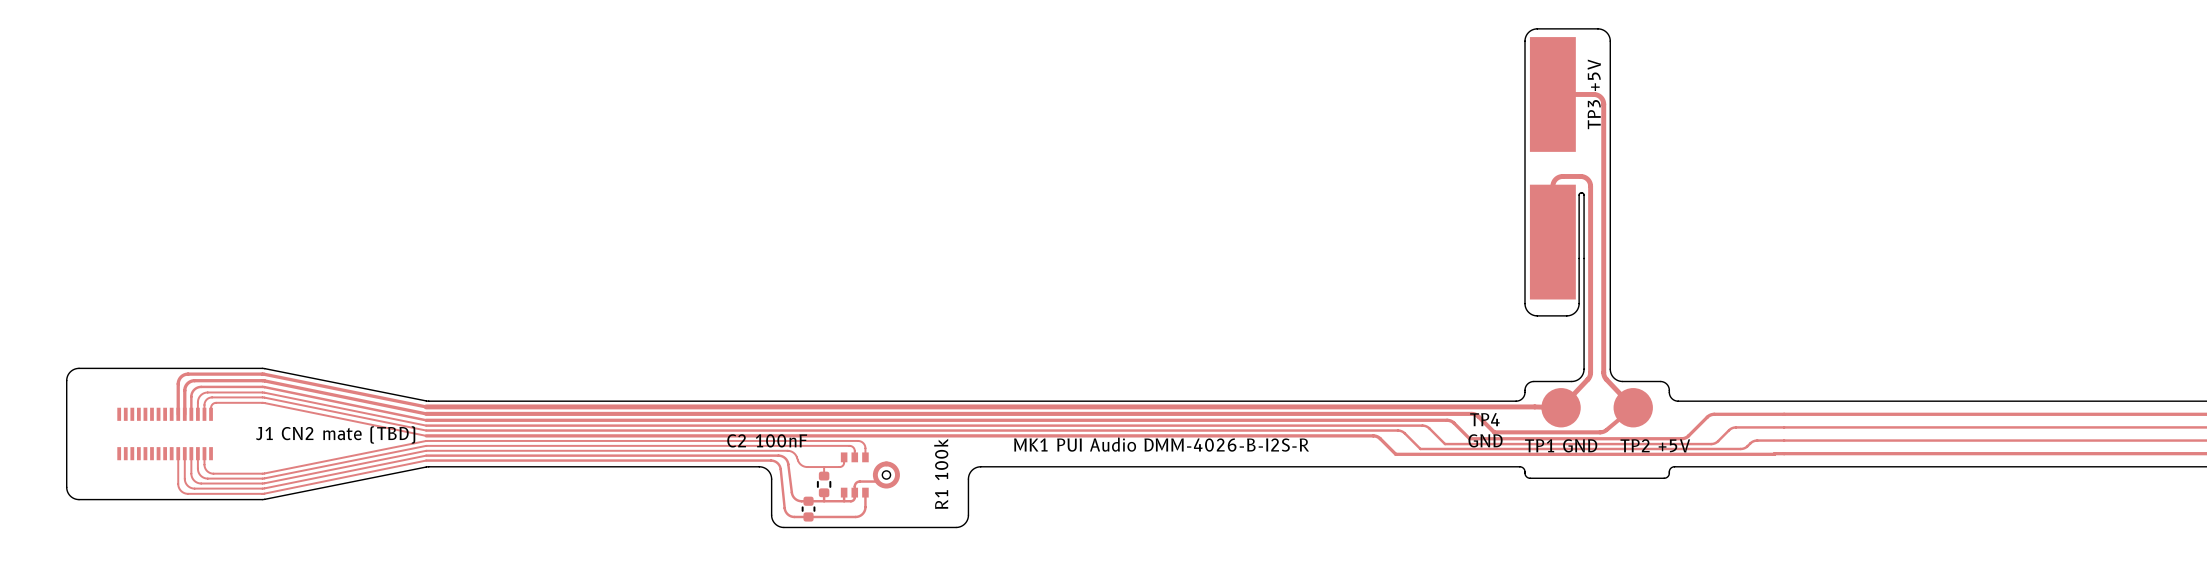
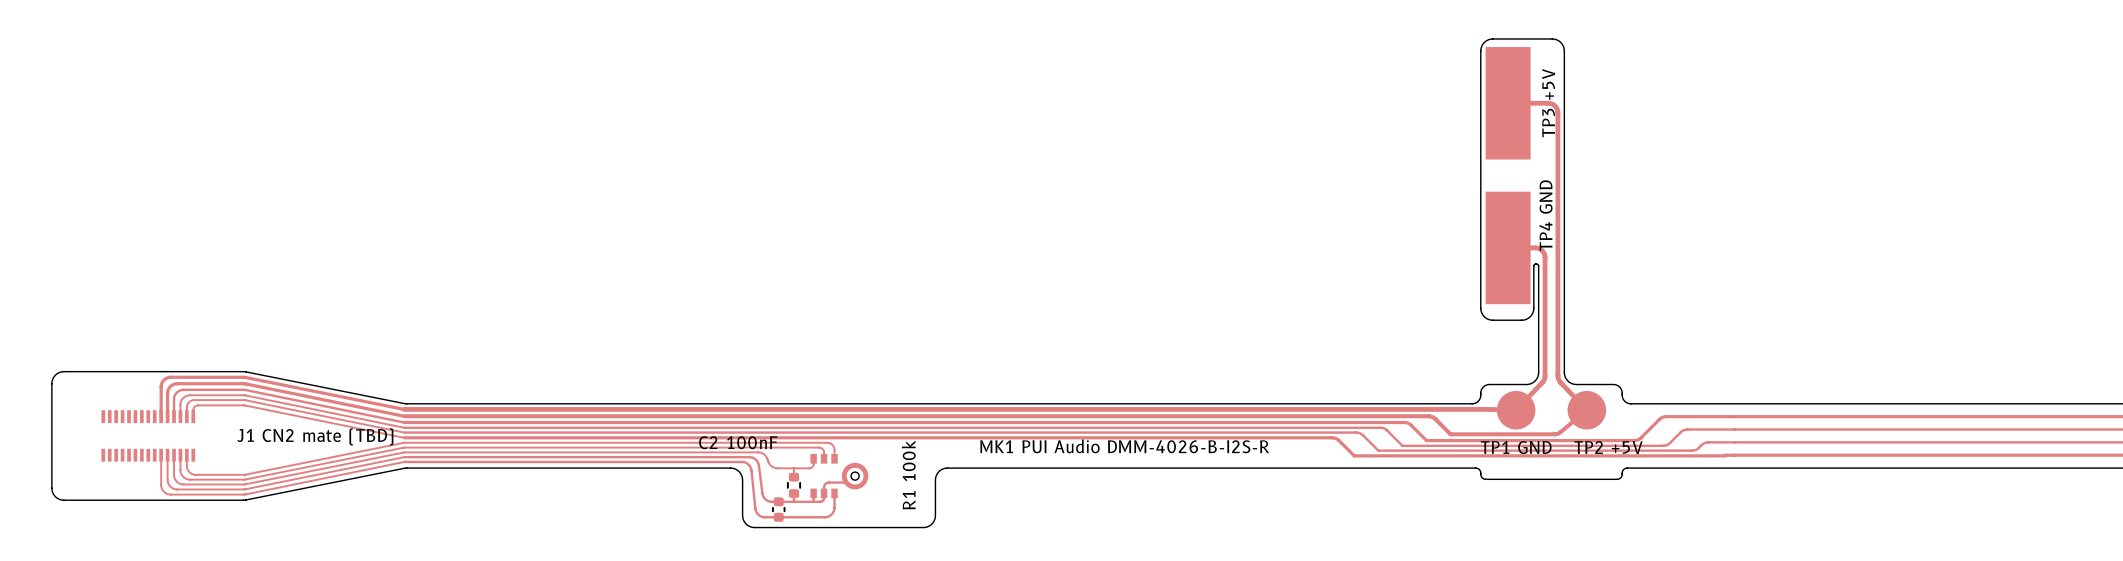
text: none -> TP4 GND (1546, 215)
track: (1552, 242) (1553, 182) (1560, 176) (1582, 176) (1587, 179) (1590, 185) (1590, 251) -> (1508, 247) (1537, 248) (1542, 251) (1545, 257)
board edge: (1579, 260) (1579, 195) (1581, 192) (1584, 195) (1584, 260) -> (1533, 266) (1535, 263) (1538, 266)
text: TP4 (1484, 419) -> none
text: GND (1485, 440) -> none

